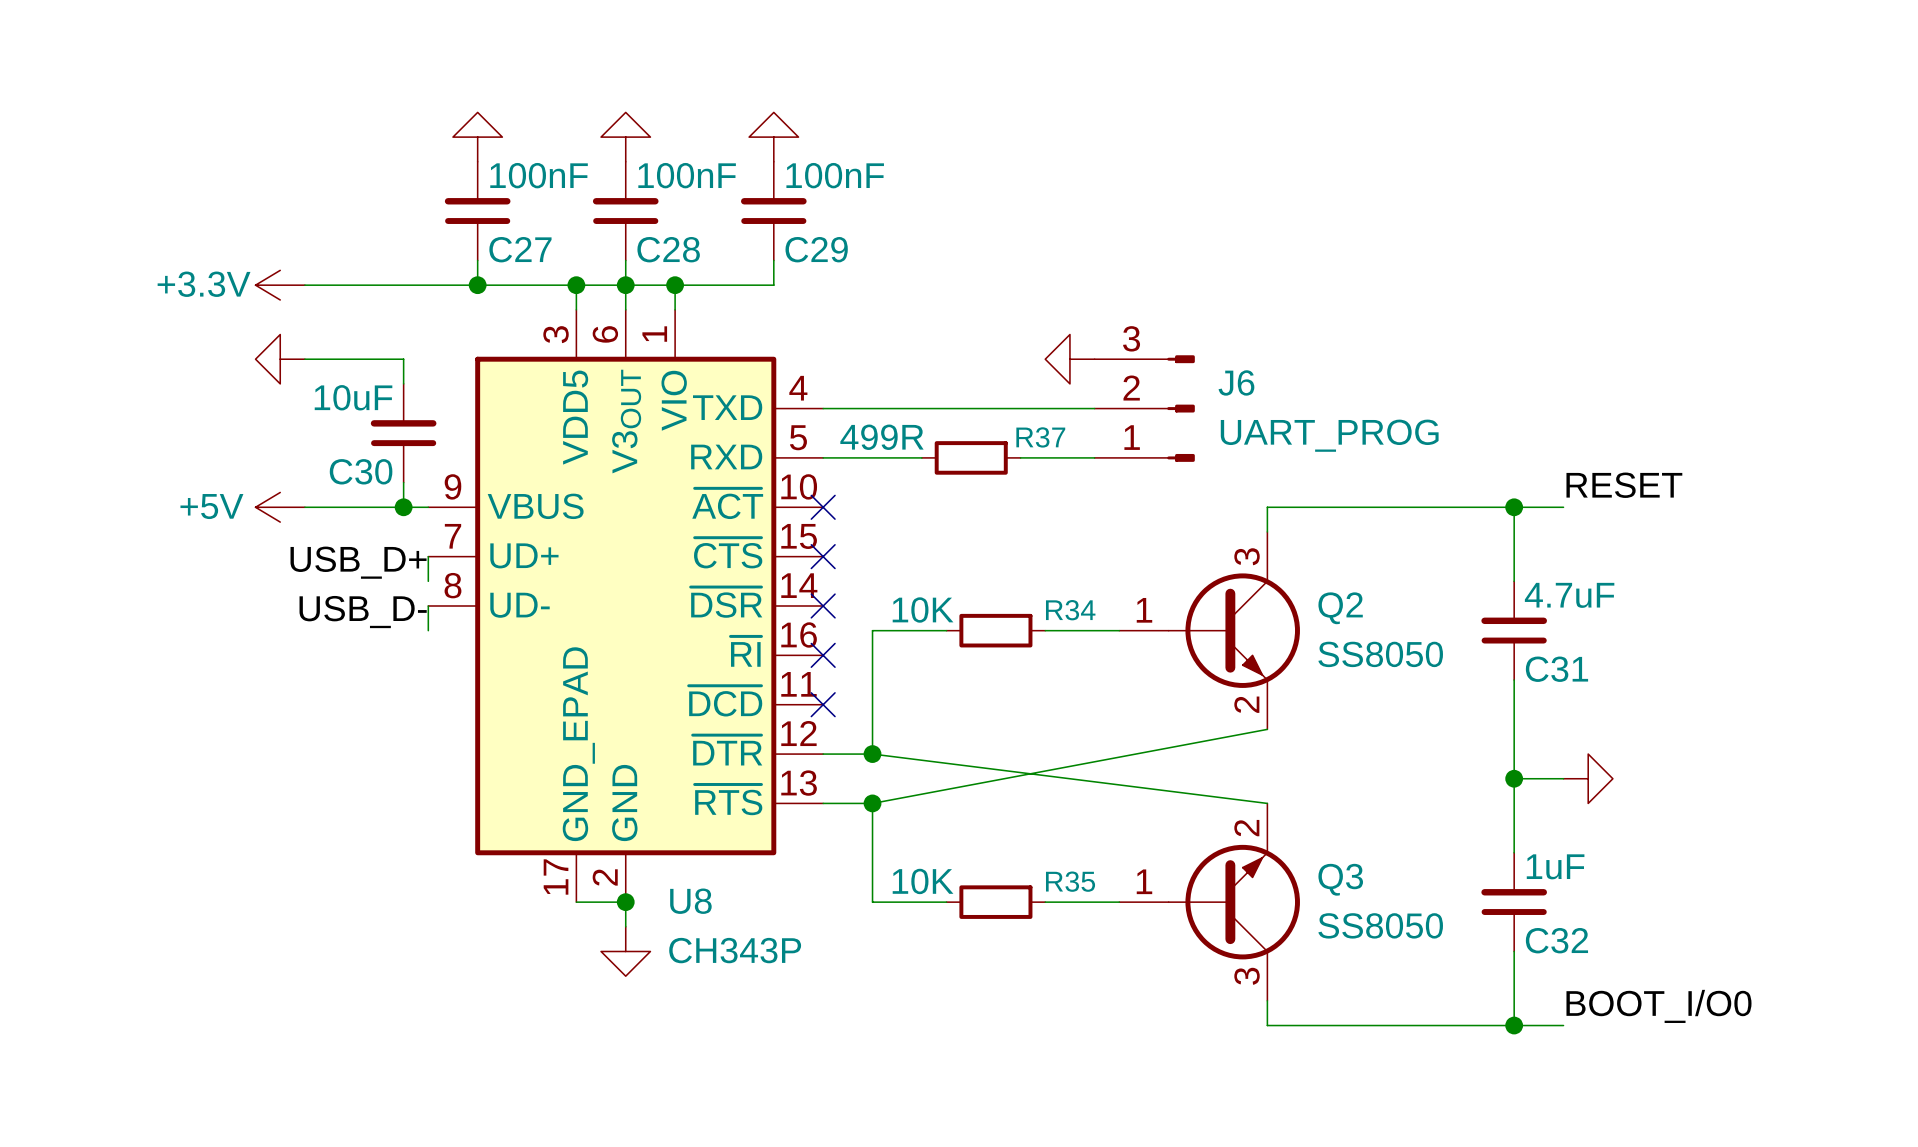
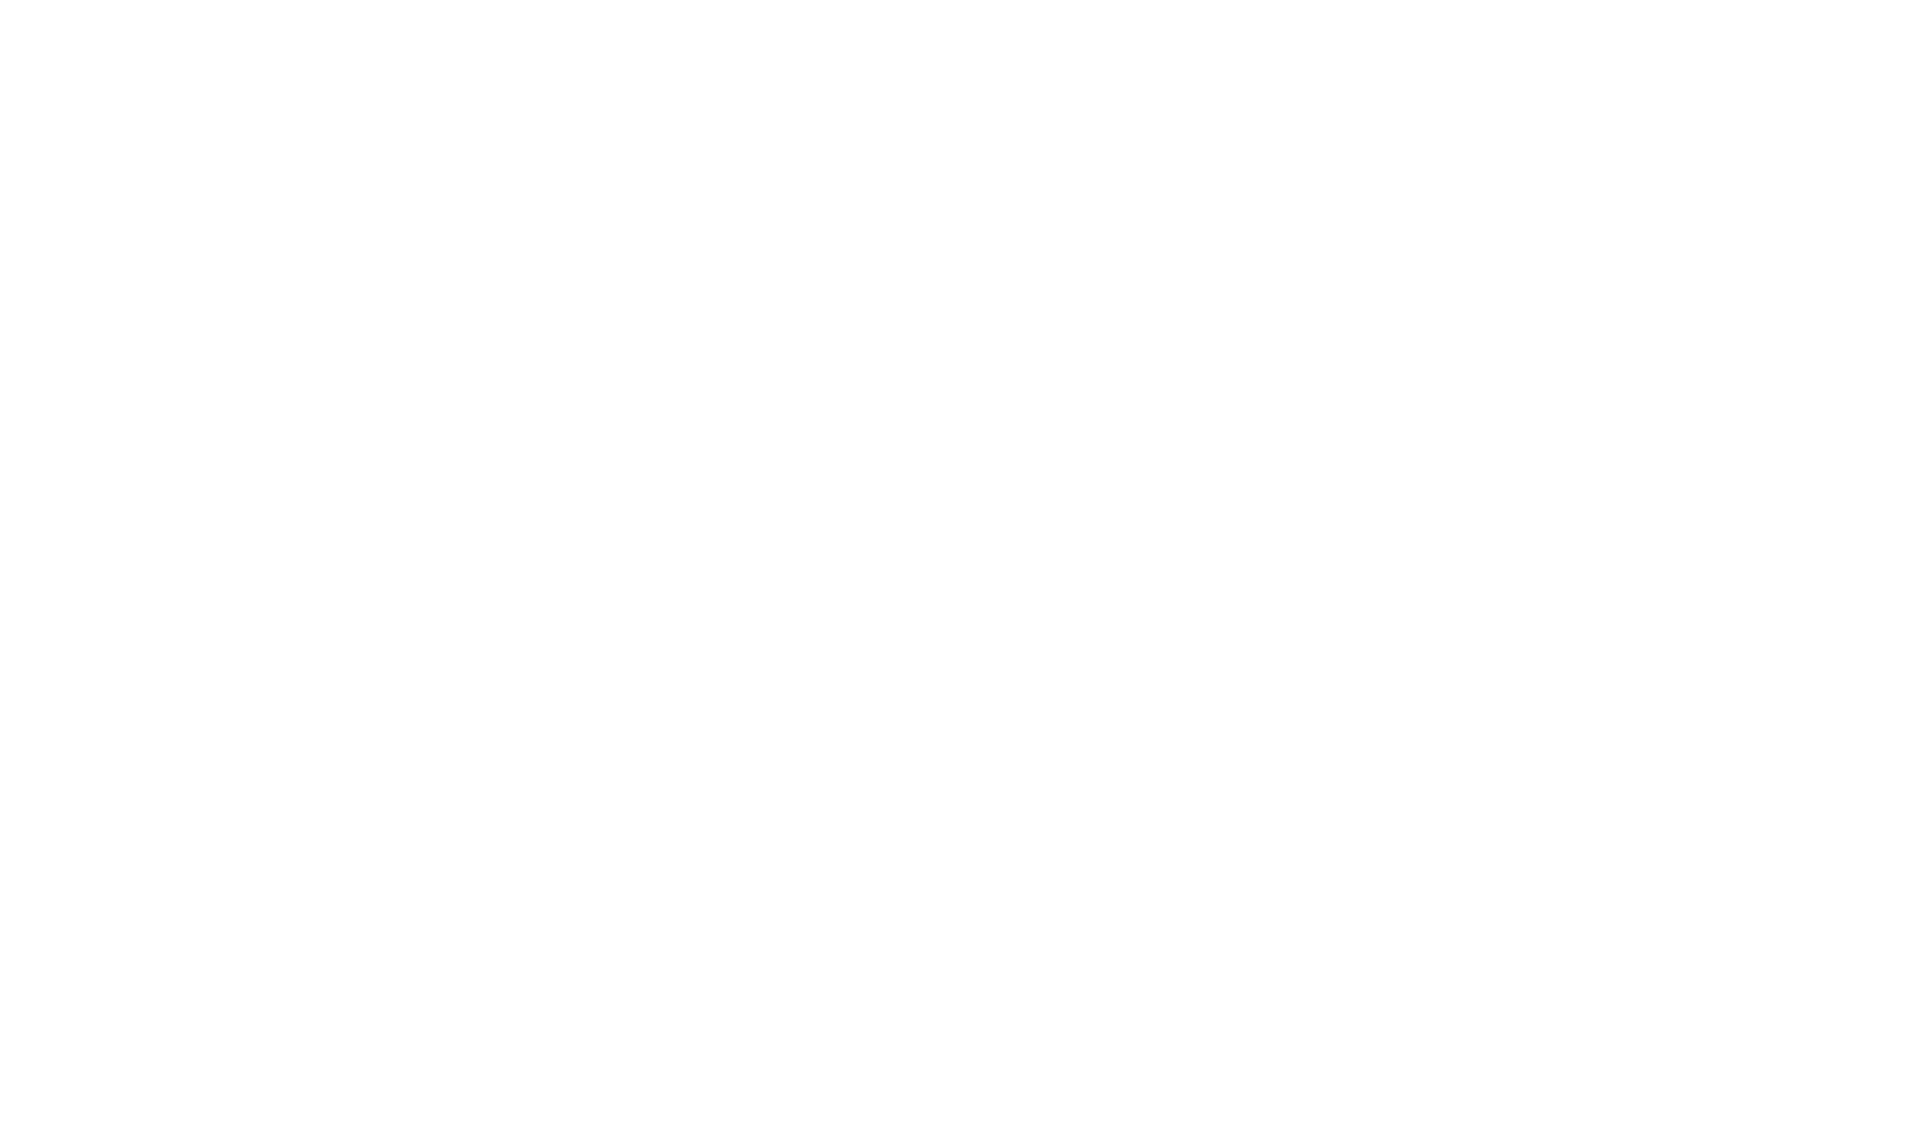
power symbol: (477, 137) -> none
power symbol: (625, 137) -> none
power symbol: (773, 137) -> none
C27: 100nF (477, 211) -> none
C28: 100nF (625, 211) -> none
C29: 100nF (773, 211) -> none
wire: (477, 260) (477, 285) -> none
wire: (625, 260) (625, 309) -> none
wire: (773, 260) (773, 285) (304, 285) -> none
power symbol: +3.3V (280, 285) -> none
junction: (477, 285) -> none
wire: (576, 285) (576, 309) -> none
junction: (576, 285) -> none
junction: (625, 285) -> none
wire: (675, 285) (675, 309) -> none
junction: (675, 285) -> none
power symbol: (280, 359) -> none
wire: (304, 359) (403, 359) (403, 383) -> none
power symbol: (1069, 359) -> none
wire: (823, 408) (1094, 408) -> none
J6: UART_PROG (1144, 408) -> none
C30: 10uF (403, 433) -> none
wire: (823, 457) (921, 457) -> none
R37: 499R (971, 457) -> none
wire: (1020, 457) (1094, 457) -> none
wire: (403, 482) (403, 507) -> none
label: RESET (1624, 485) -> none
power symbol: +5V (280, 507) -> none
wire: (304, 507) (428, 507) -> none
junction: (403, 507) -> none
no-connect mark: (823, 507) -> none
wire: (1514, 507) (1514, 581) -> none
junction: (1514, 507) -> none
wire: (1563, 507) (1267, 507) (1267, 531) -> none
wire: (428, 556) (428, 581) -> none
no-connect mark: (823, 556) -> none
label: USB_D+ (358, 562) -> none
wire: (428, 605) (428, 630) -> none
U8: CH343P (625, 605) -> none
no-connect mark: (823, 605) -> none
label: USB_D- (363, 612) -> none
wire: (946, 630) (872, 630) (872, 754) -> none
R34: 10K (995, 630) -> none
wire: (1045, 630) (1119, 630) -> none
Q2: SS8050 (1209, 630) -> none
C31: 4.7uF (1514, 630) -> none
no-connect mark: (823, 655) -> none
wire: (1514, 680) (1514, 852) -> none
no-connect mark: (823, 704) -> none
wire: (1267, 729) (872, 803) -> none
wire: (823, 754) (872, 754) -> none
wire: (872, 754) (1267, 803) -> none
junction: (872, 754) -> none
wire: (1514, 778) (1563, 778) -> none
junction: (1514, 778) -> none
power symbol: (1588, 778) -> none
wire: (823, 803) (872, 803) -> none
wire: (872, 803) (872, 902) (946, 902) -> none
junction: (872, 803) -> none
wire: (576, 902) (625, 902) (625, 926) -> none
junction: (625, 902) -> none
R35: 10K (995, 902) -> none
wire: (1045, 902) (1119, 902) -> none
Q3: SS8050 (1209, 902) -> none
C32: 1uF (1514, 902) -> none
power symbol: (625, 951) -> none
wire: (1514, 951) (1514, 1025) -> none
wire: (1267, 1000) (1267, 1025) (1563, 1025) -> none
label: BOOT_I/O0 (1658, 1006) -> none
junction: (1514, 1025) -> none

